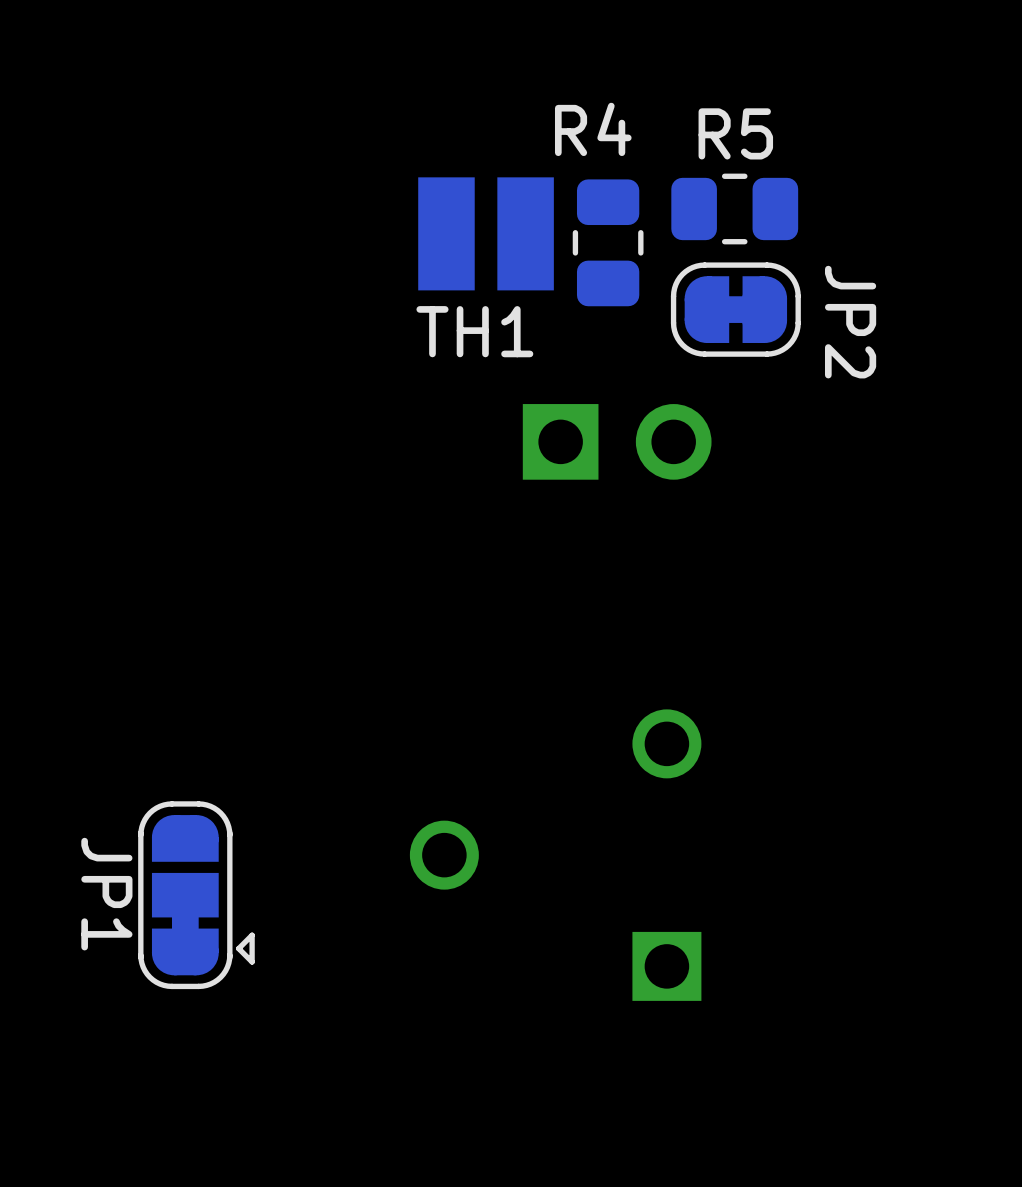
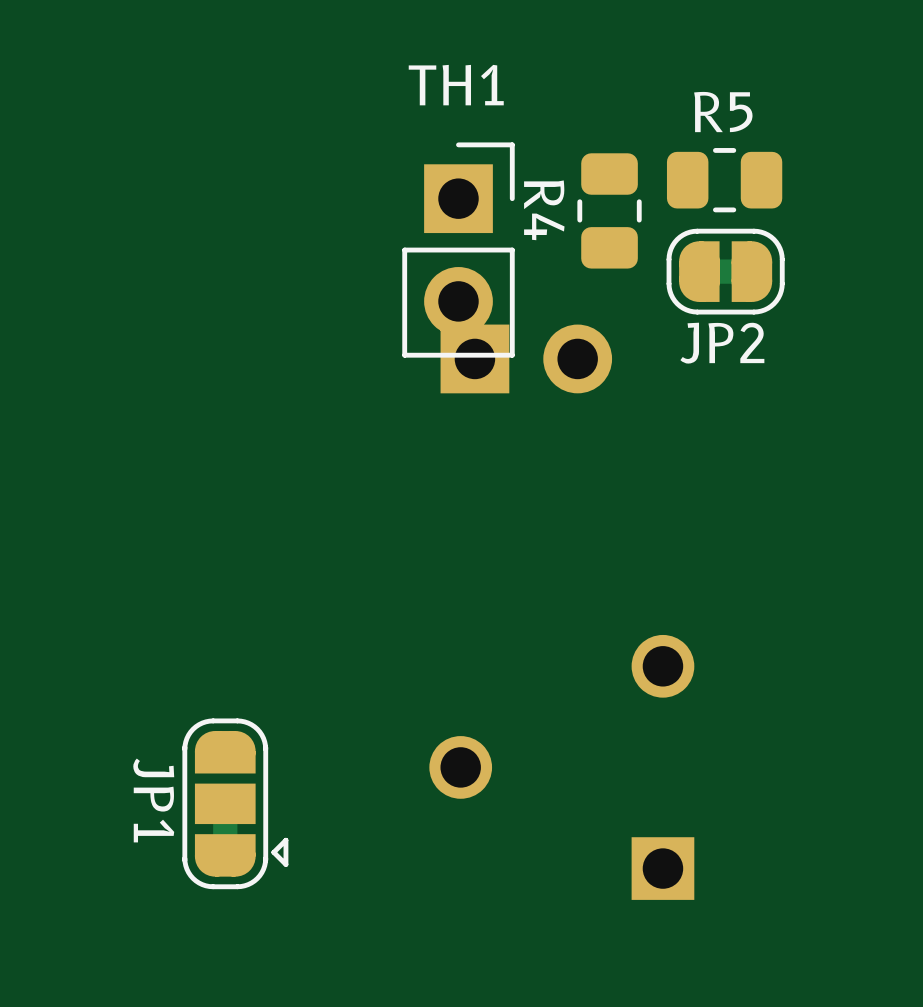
R4 name rotation: 0° (593, 129) -> 90° clockwise (544, 210)
R4 name position: R4 (593, 129) -> R4 (544, 210)
TH1 footprint: [418, 177, 554, 291] -> [402, 142, 515, 358]
JP2 name rotation: 0° (850, 322) -> 90° counterclockwise (722, 343)
TH1 name position: TH1 (474, 331) -> TH1 (456, 85)
part position: (617, 441) -> (526, 358)

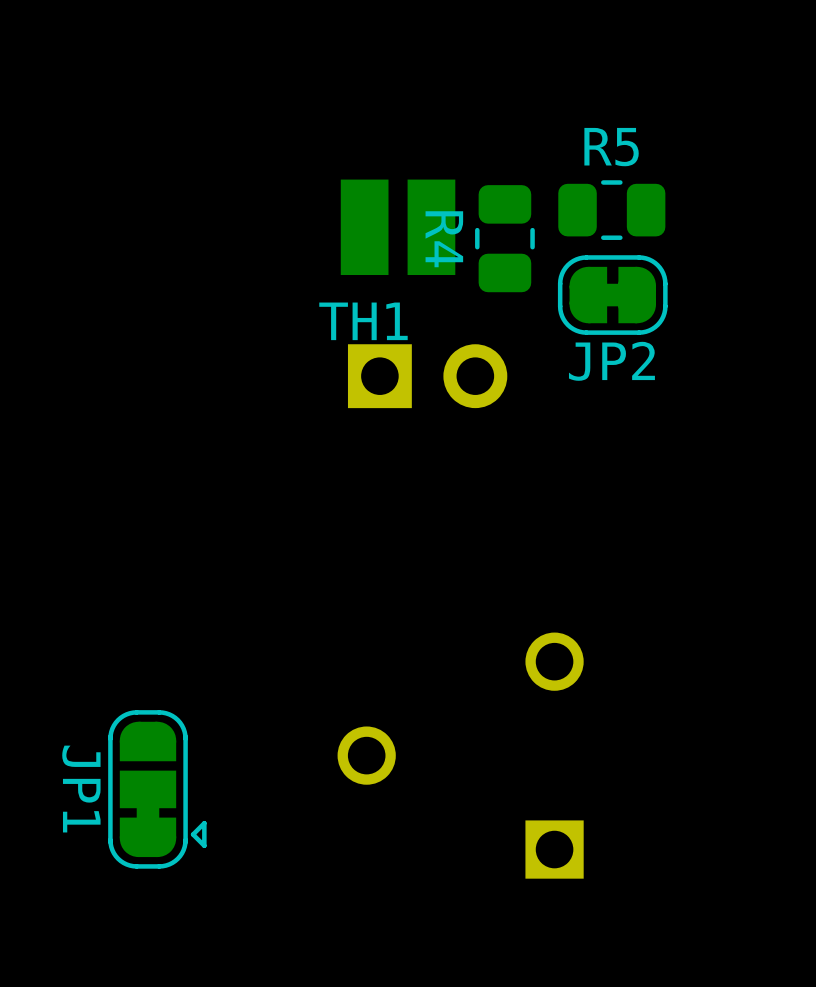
TH1 name position: TH1 (456, 85) -> TH1 (363, 321)
TH1 footprint: [402, 142, 515, 358] -> [340, 179, 456, 276]

